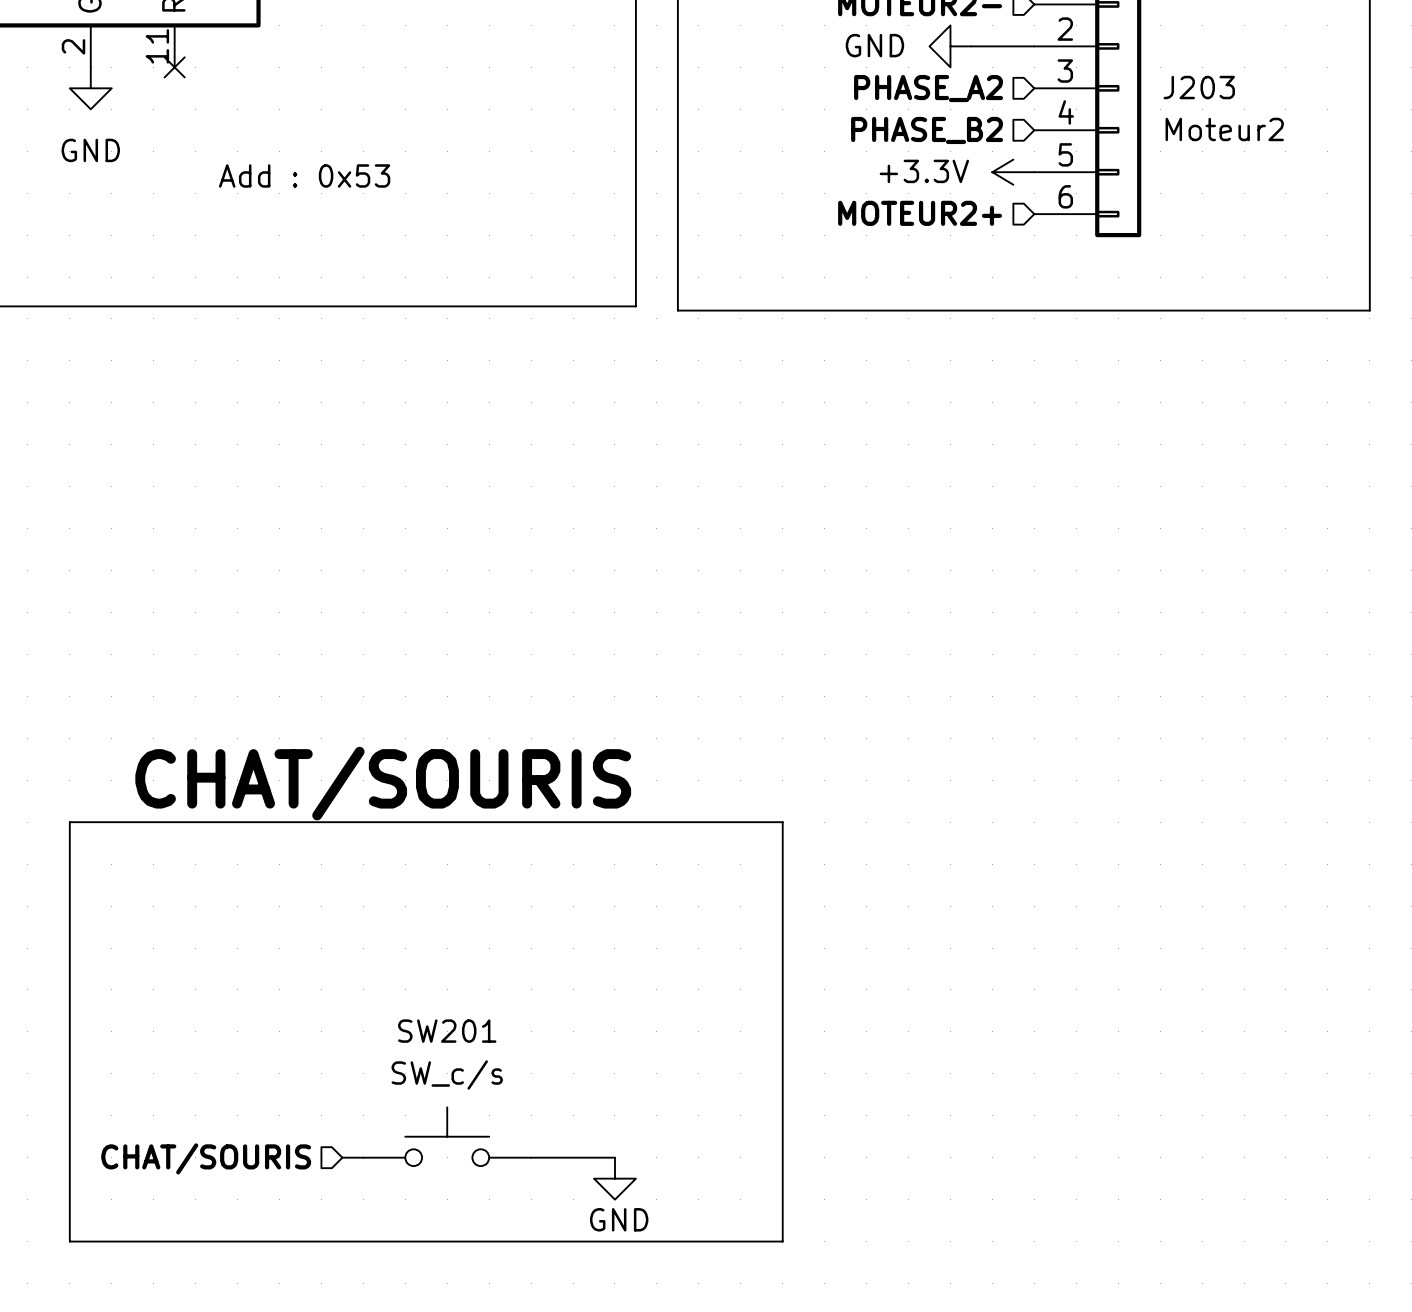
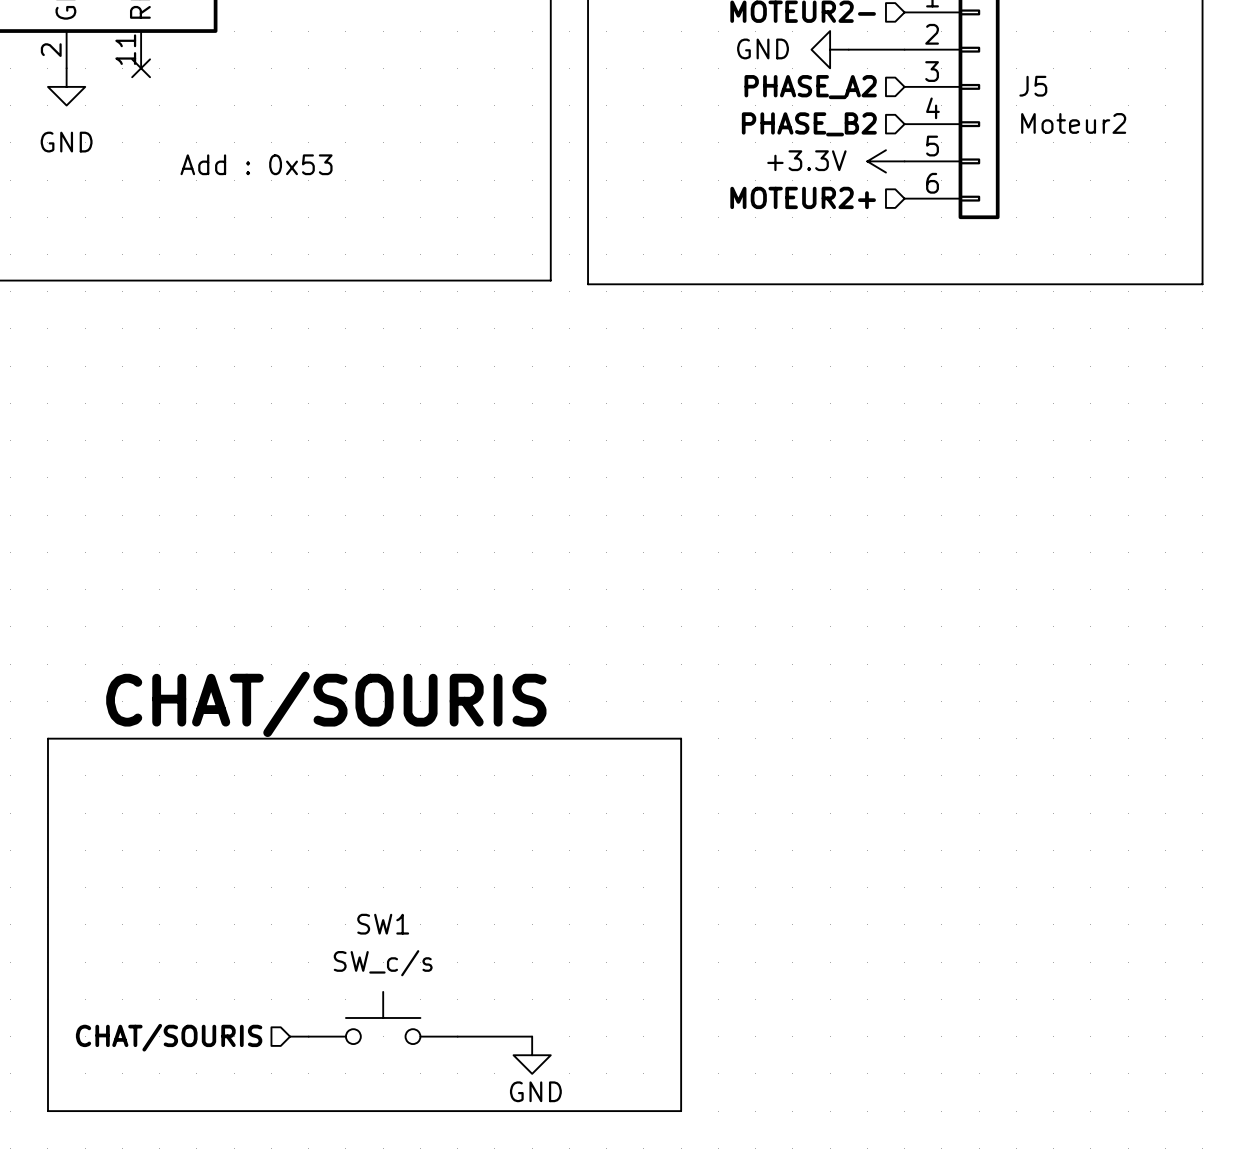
J203 name: J203 (1199, 87) -> J5 (1033, 86)
SW201 name: SW201 (447, 1031) -> SW1 (383, 924)

